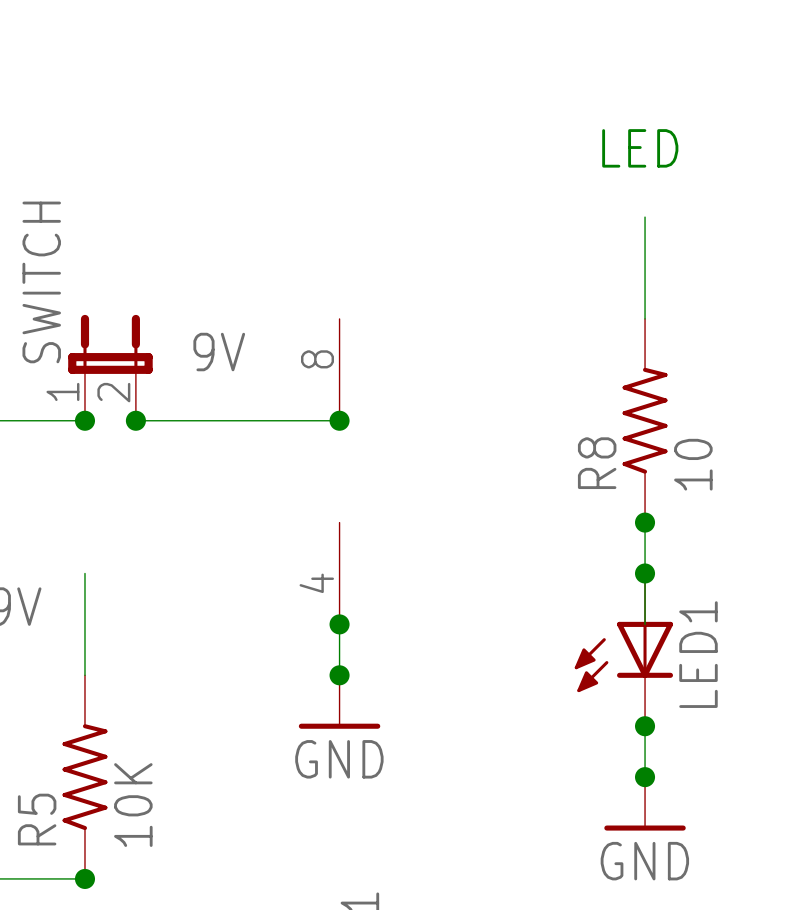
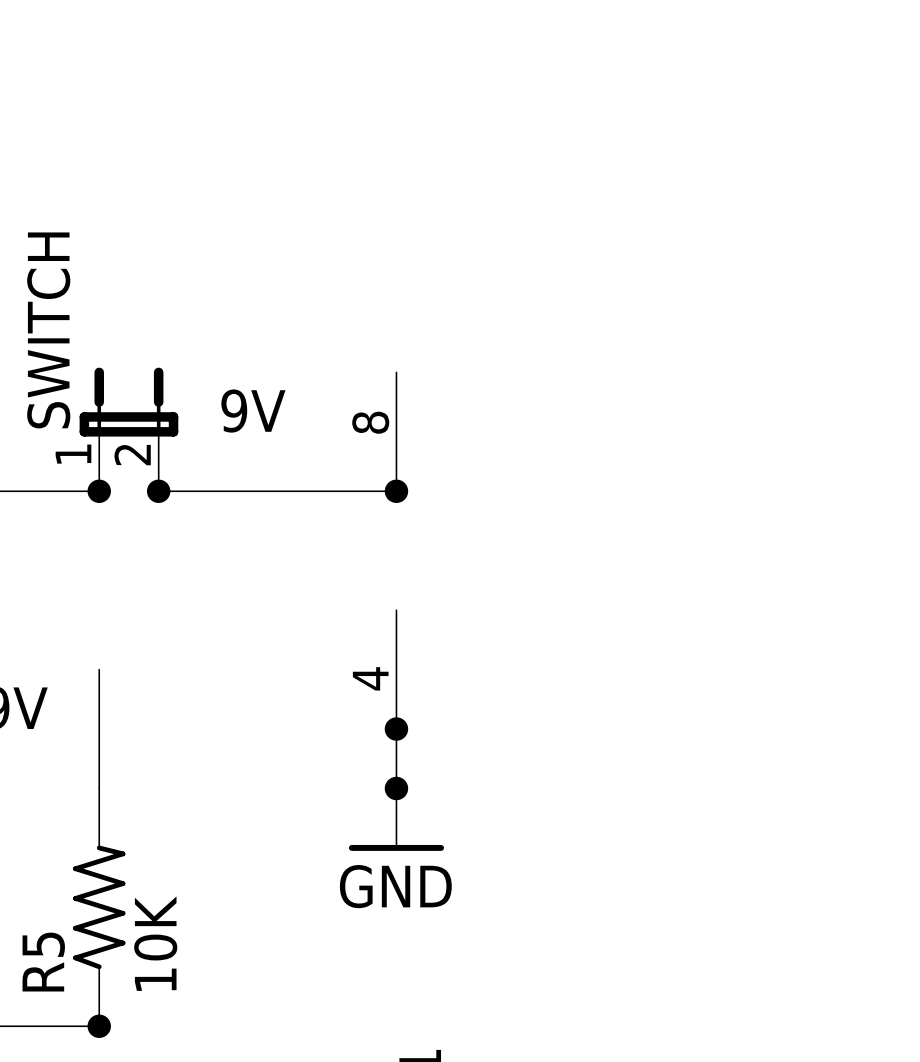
text: LED (640, 148) -> none
wire: (645, 217) (645, 318) -> none
R8: 10 (645, 420) -> none
wire: (645, 522) (645, 624) -> none
junction: (645, 522) -> none
junction: (645, 573) -> none
LED1: (623, 649) -> none
wire: (645, 726) (645, 777) -> none
junction: (645, 726) -> none
junction: (645, 777) -> none
power symbol: GND (645, 803) -> none

